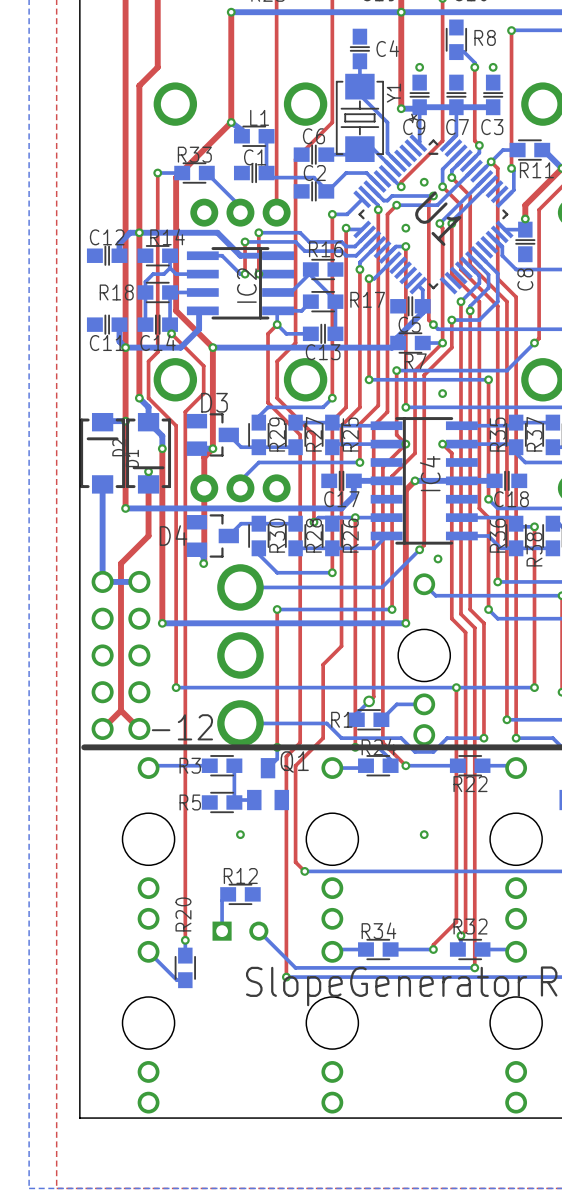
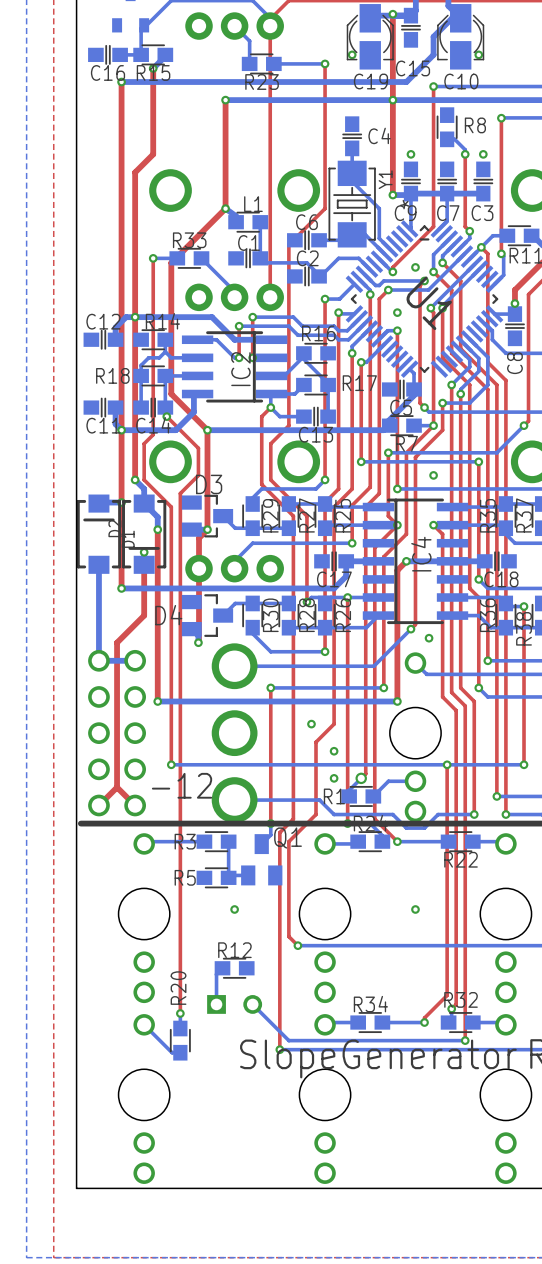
via: none -> (311, 724)
via: none -> (334, 751)
via: none -> (334, 778)
text position: -12 (182, 727) -> -12 (182, 785)

